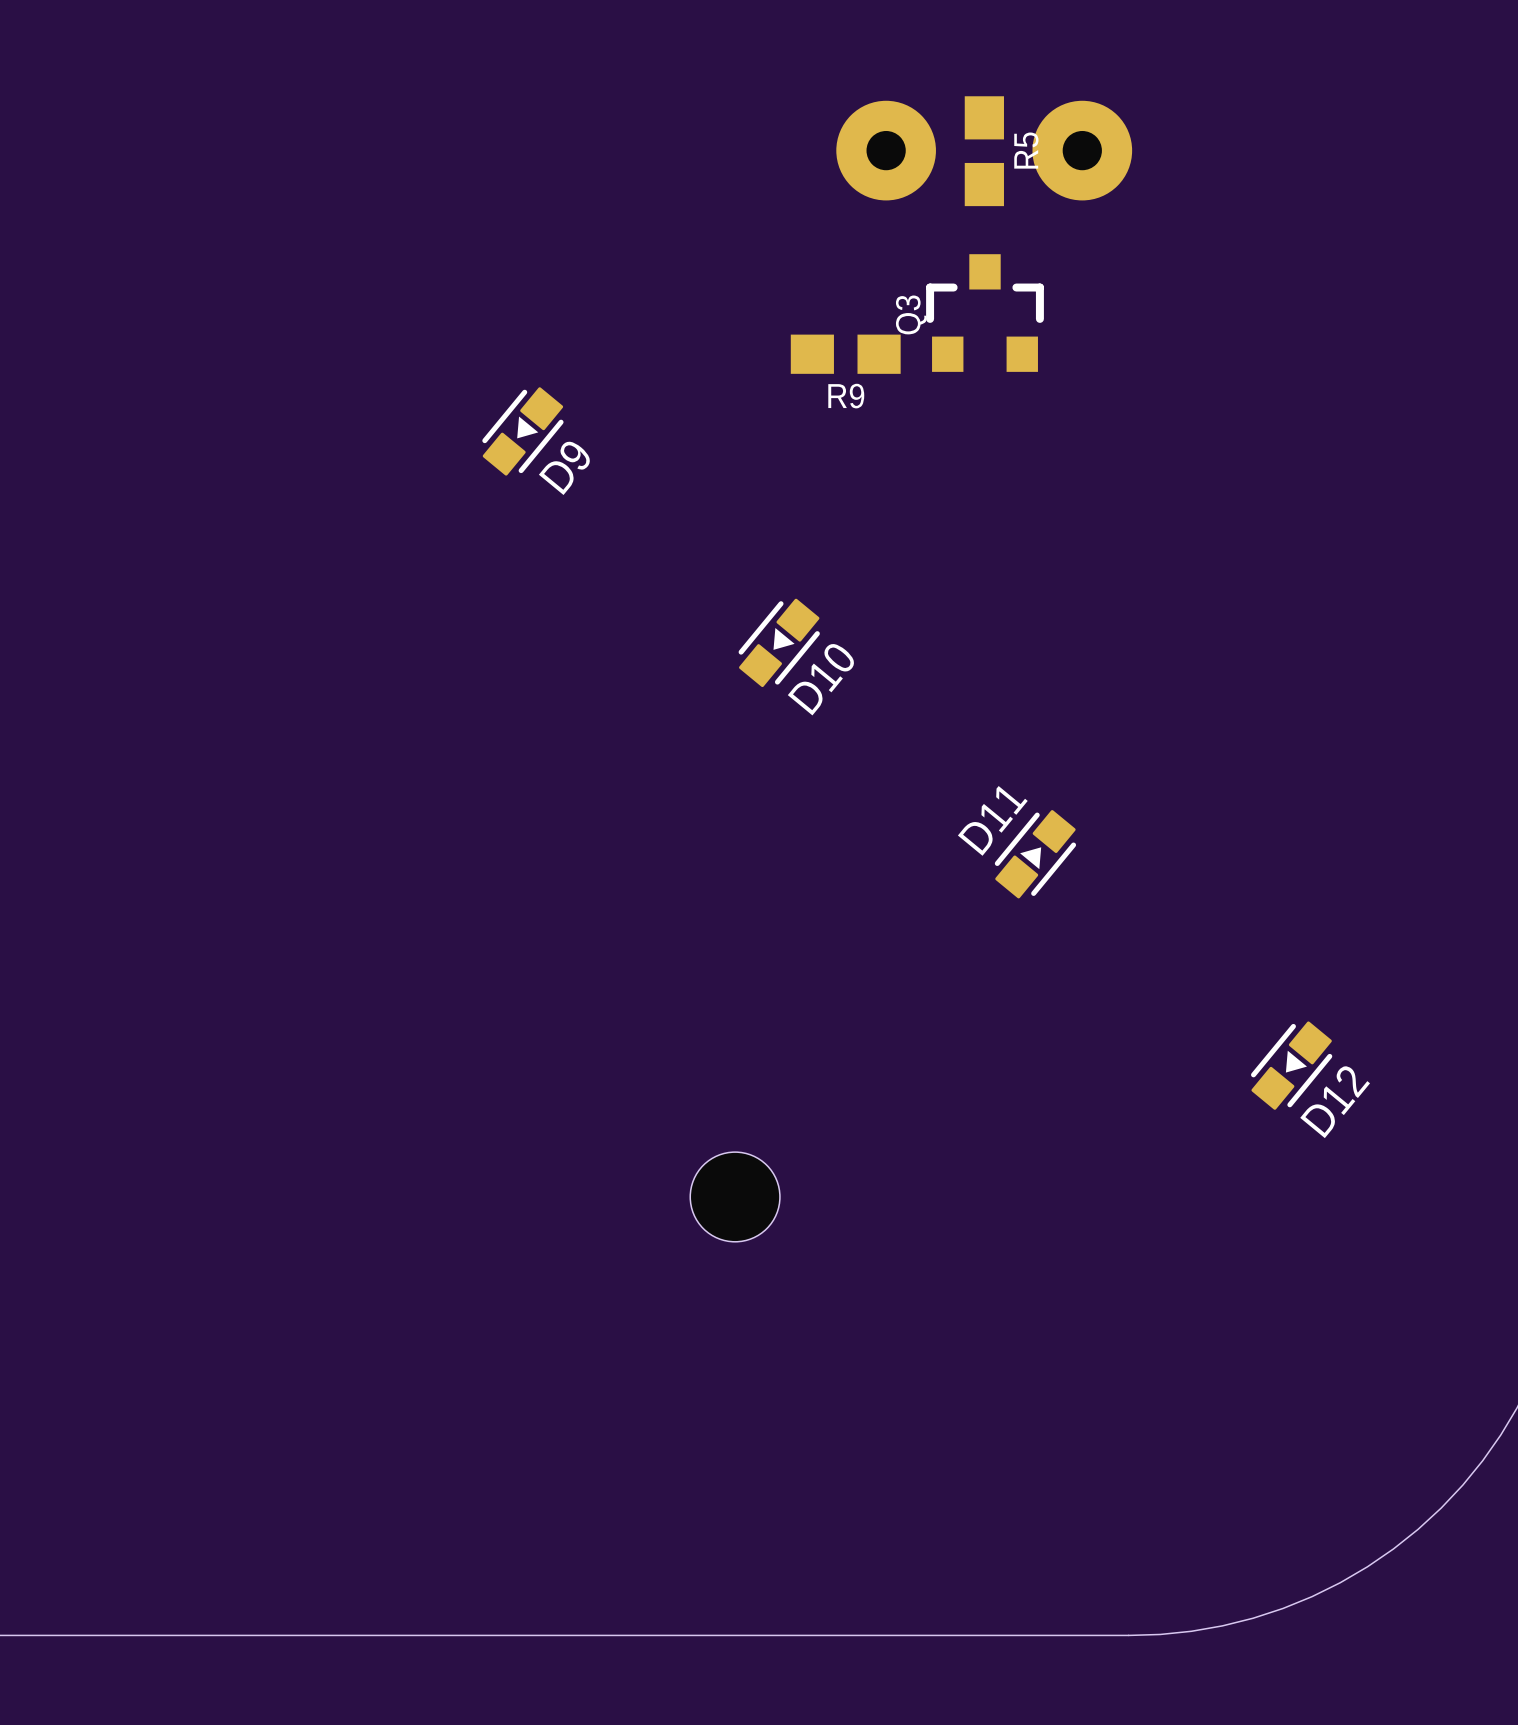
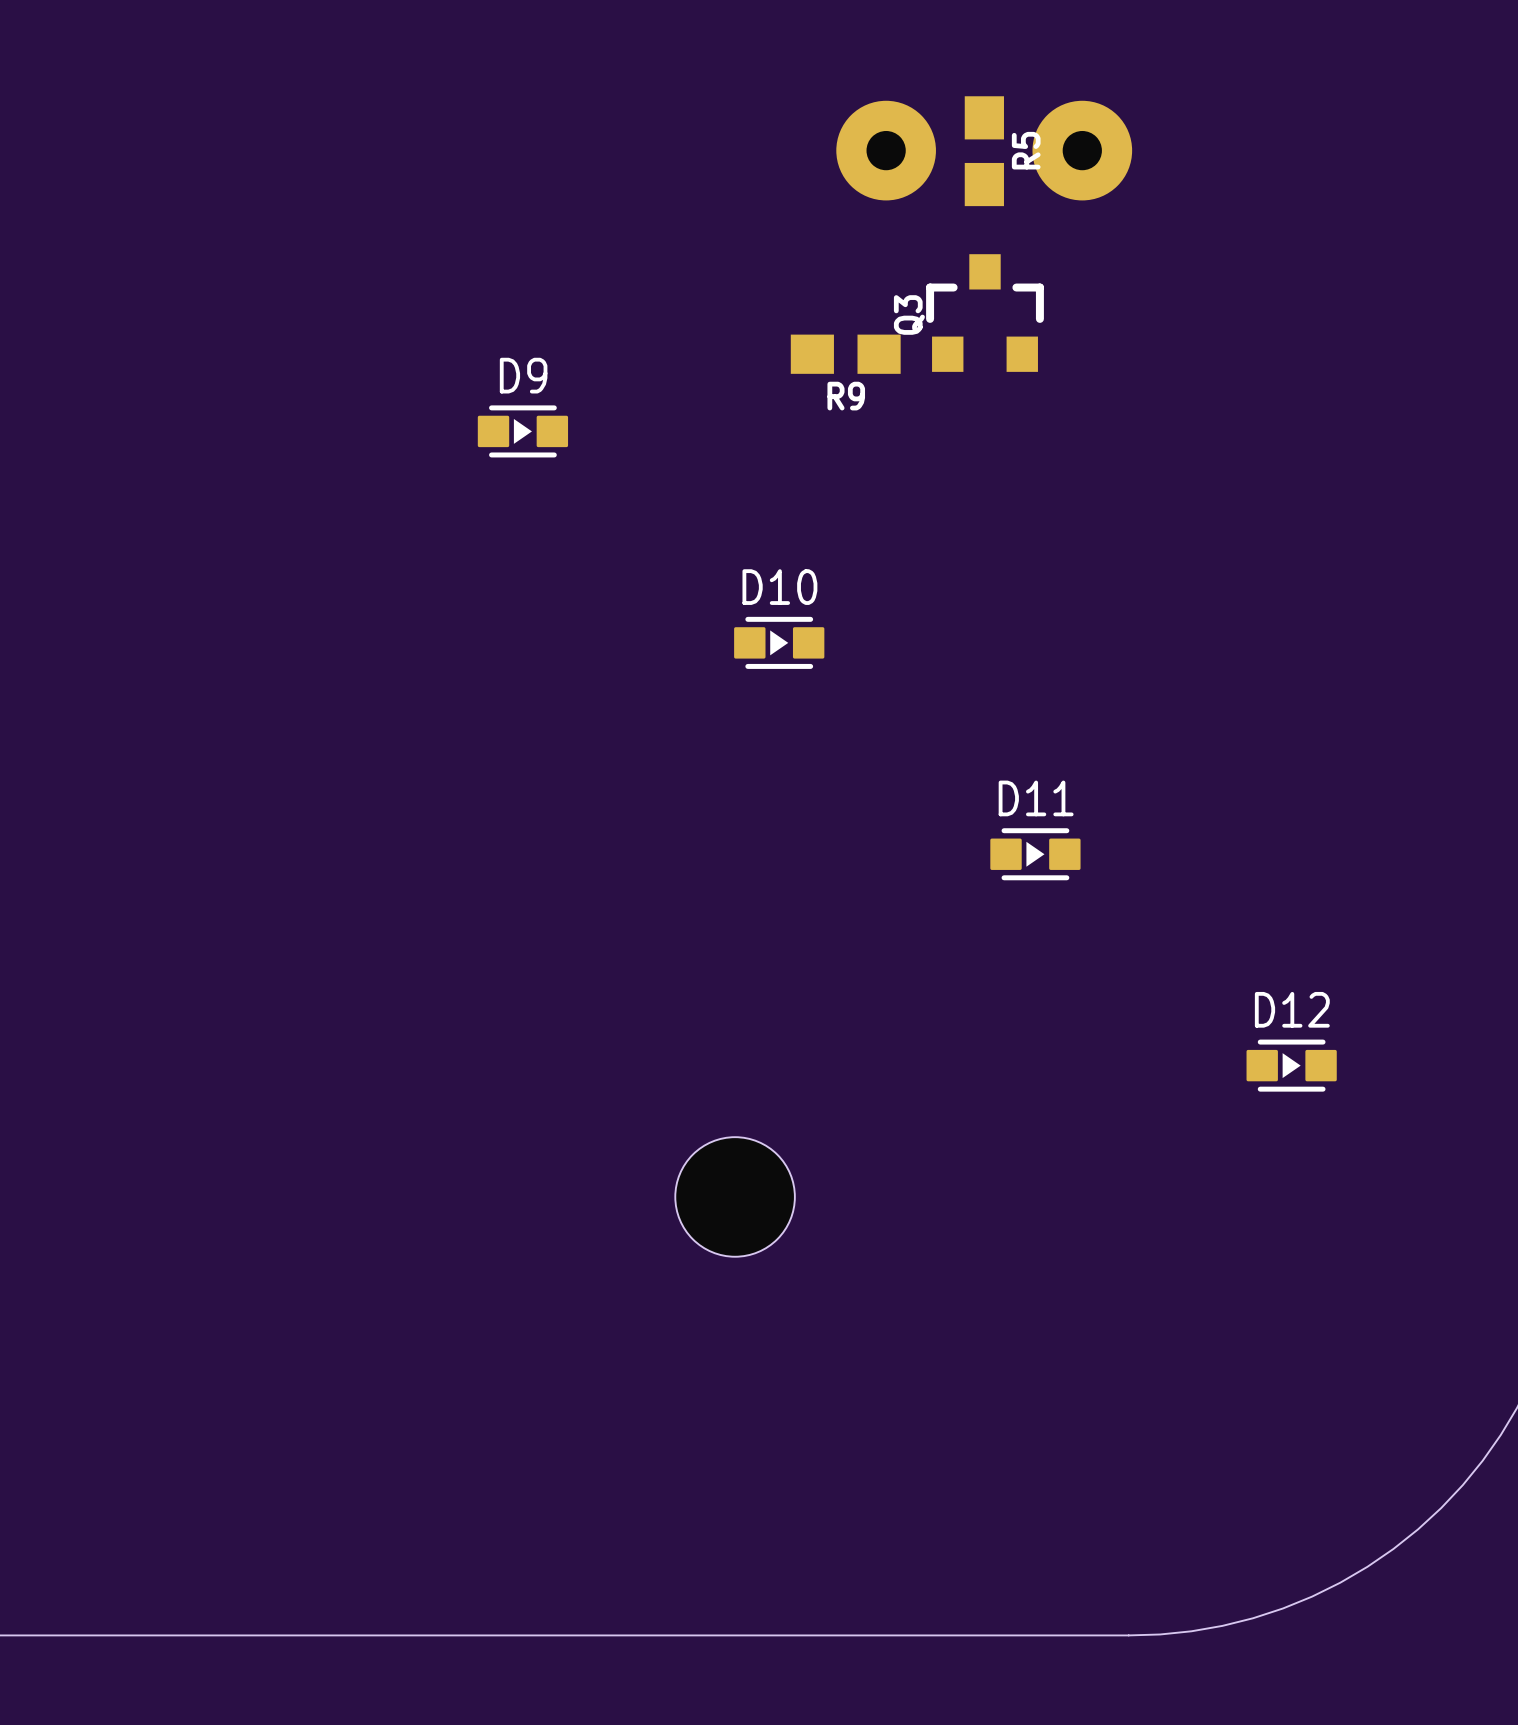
D9 rotation: 0° (522, 431) -> 129.5° counterclockwise (522, 431)
D10 rotation: 0° (779, 642) -> 129.5° counterclockwise (779, 642)
D11 rotation: 0° (1035, 854) -> 50.5° clockwise (1035, 854)
D12 rotation: 0° (1291, 1065) -> 129.5° counterclockwise (1291, 1065)
hole size: [690, 1152, 780, 1242] -> [675, 1137, 795, 1257]

